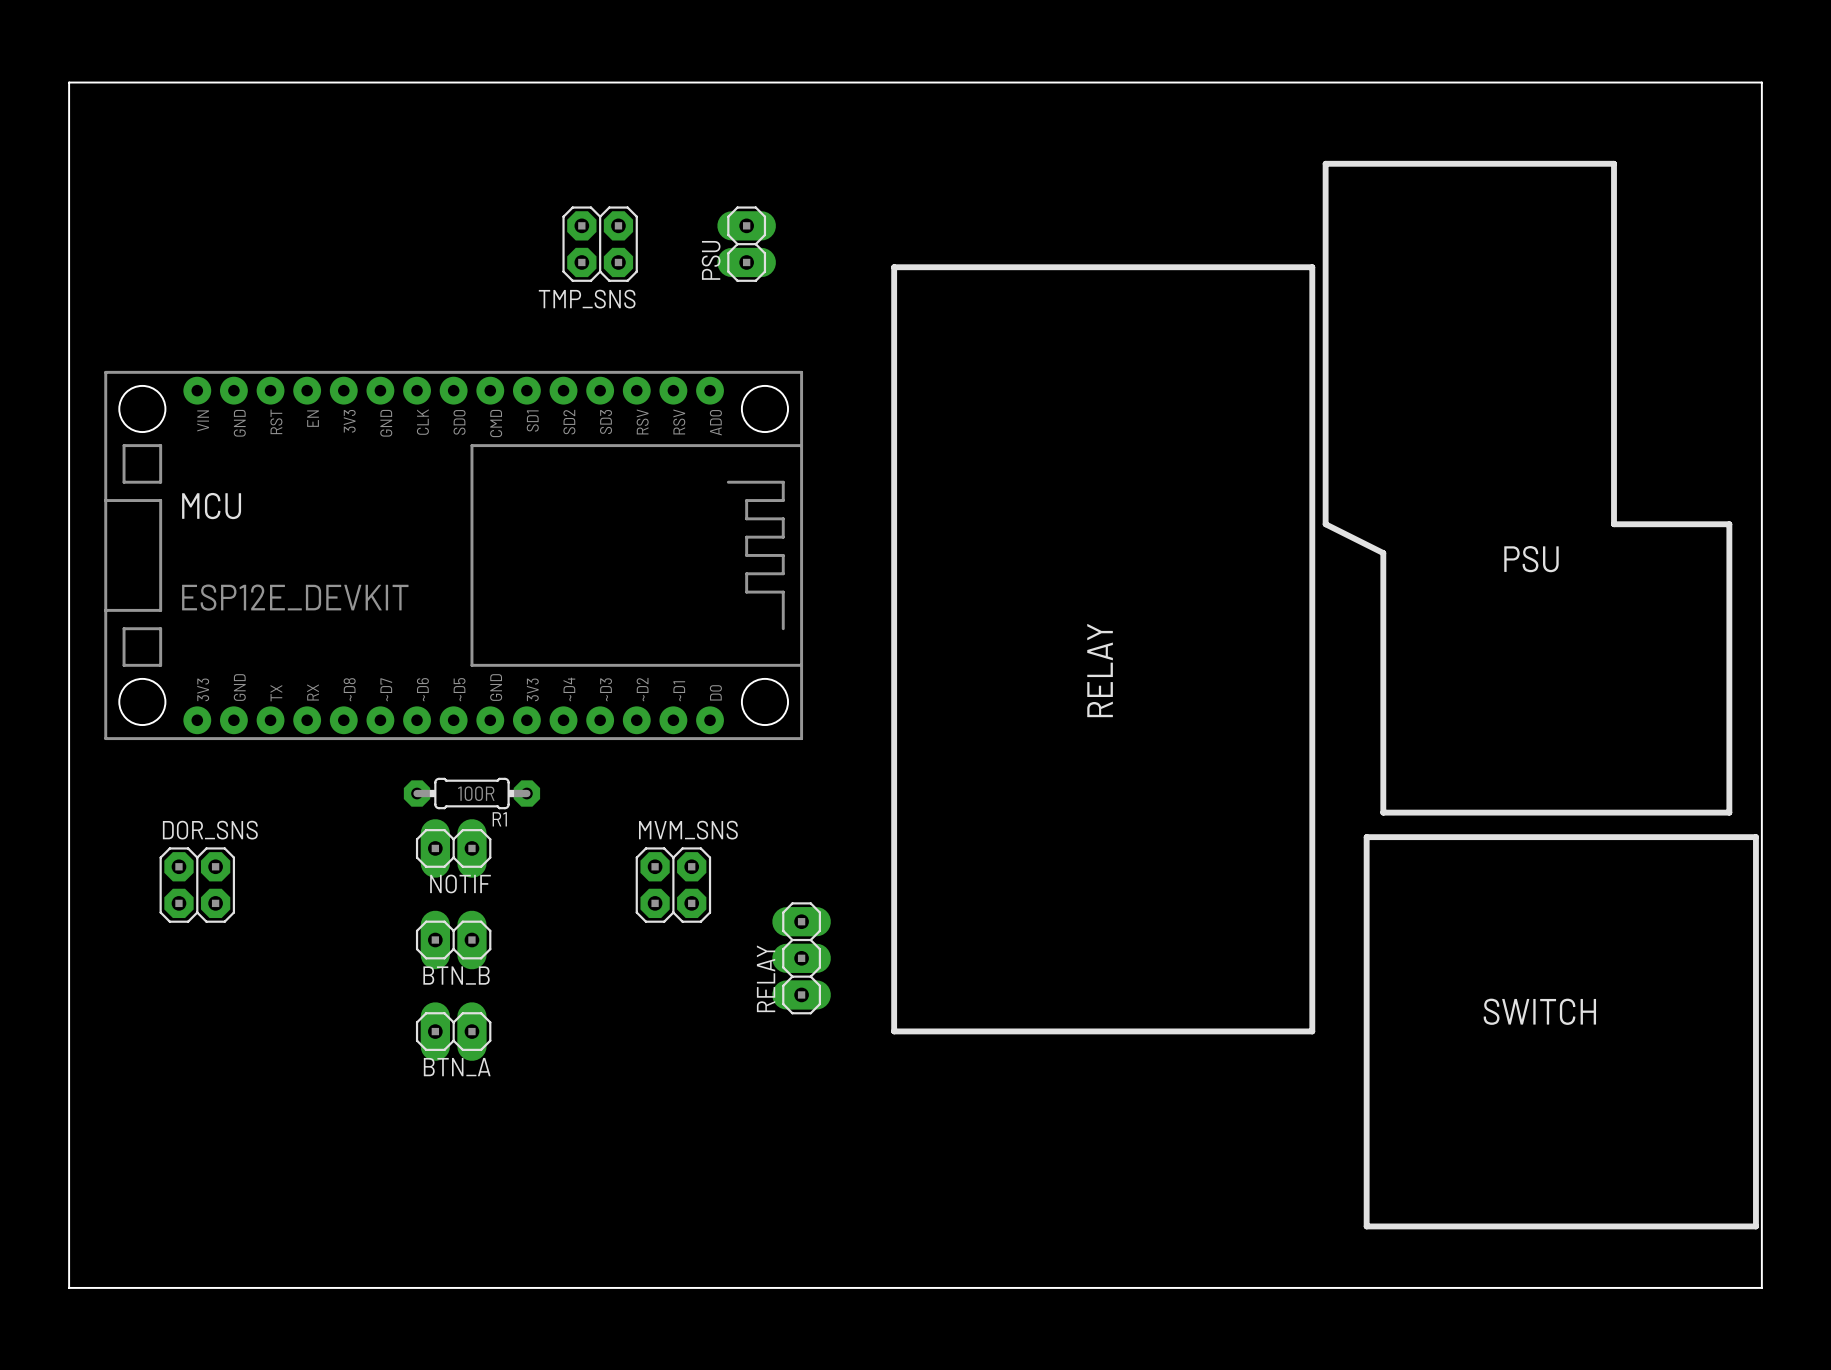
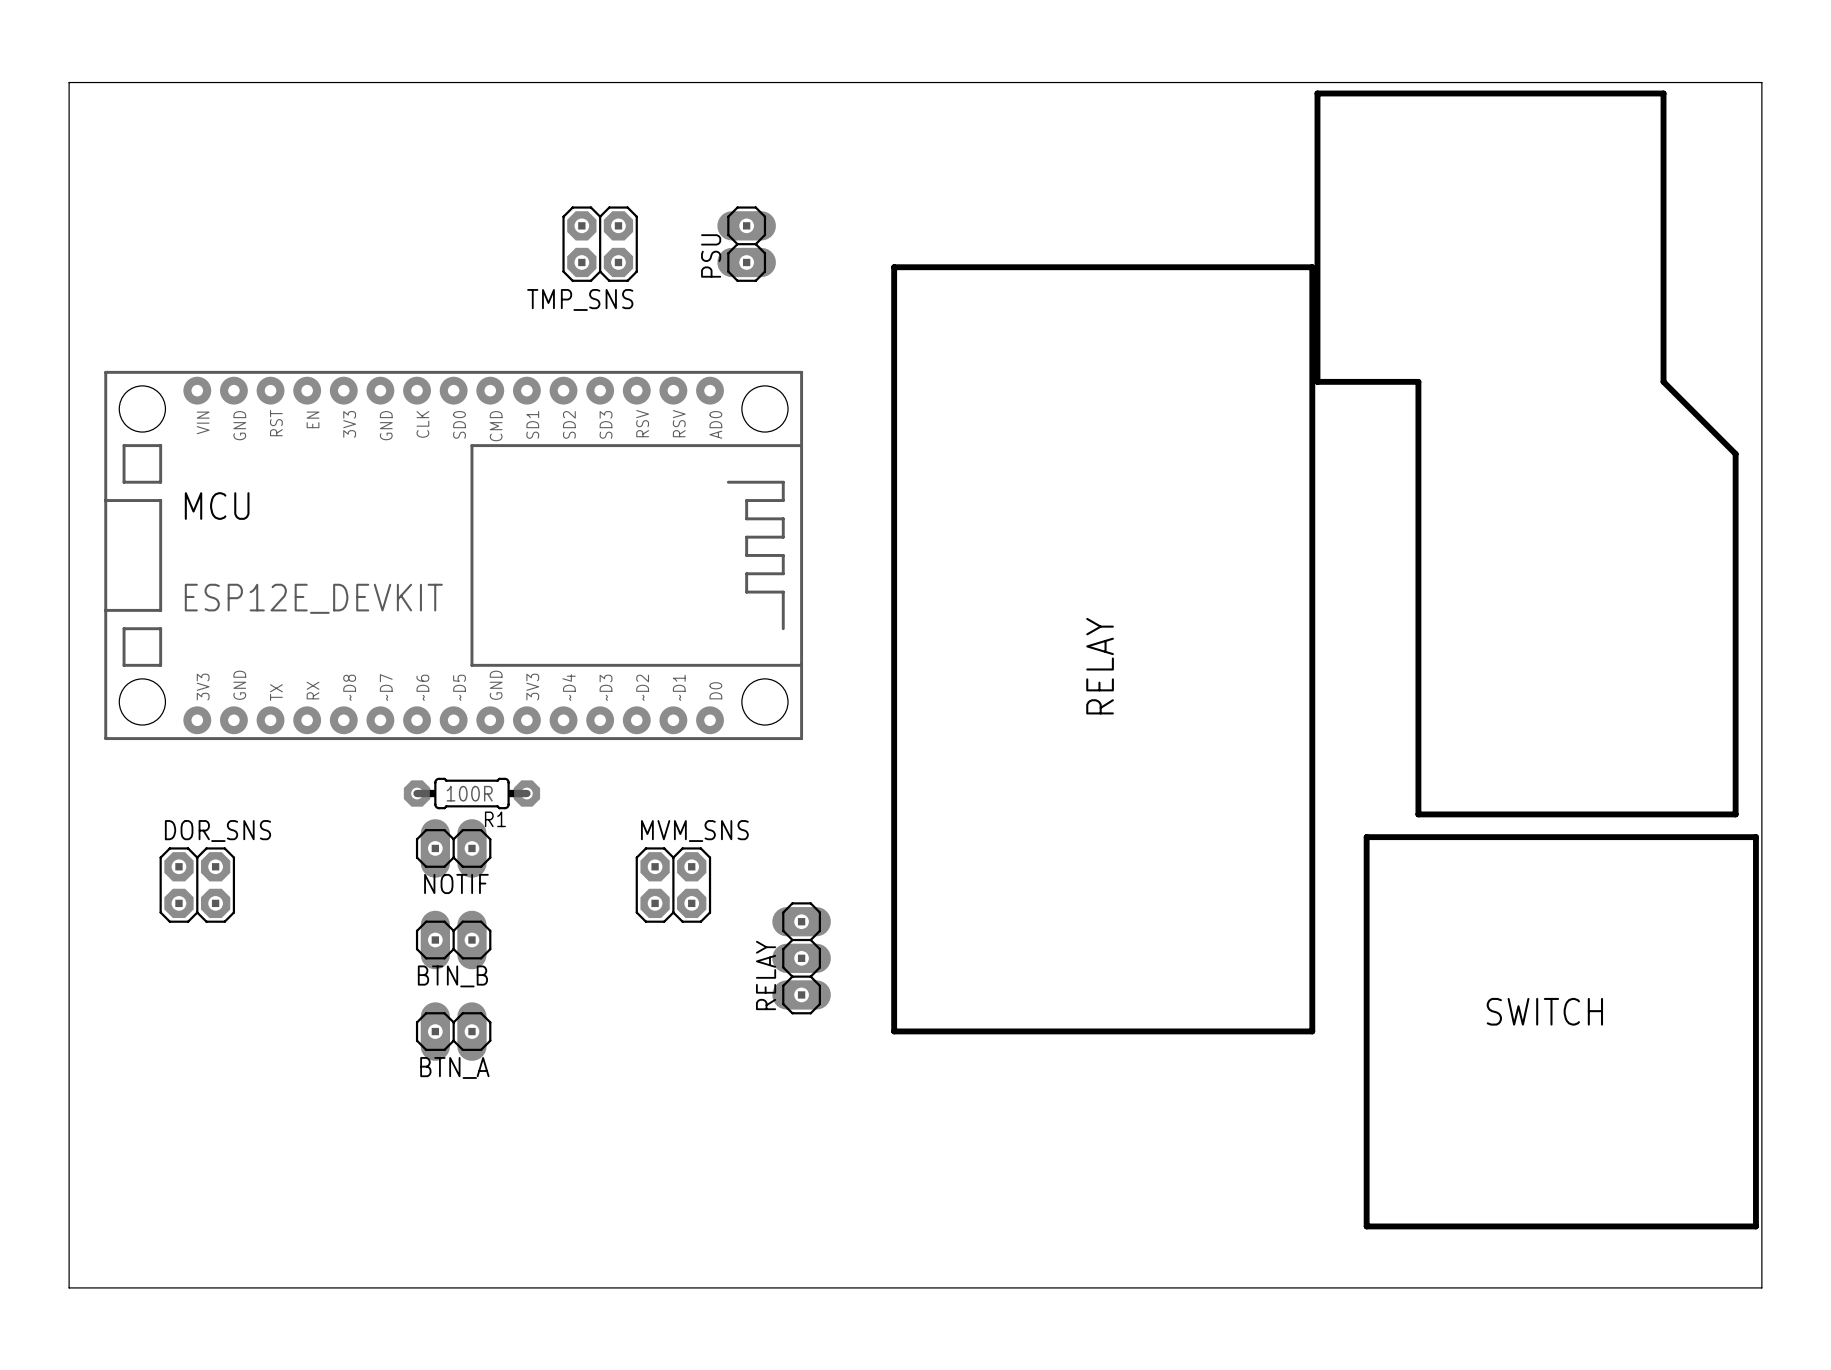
line: (1325, 163) (1325, 524) (1383, 553) (1383, 812) (1729, 812) (1729, 524) (1614, 524) (1614, 163) (1325, 163) -> (1317, 93) (1317, 381) (1418, 381) (1418, 814) (1735, 814) (1735, 453) (1663, 381) (1663, 93) (1317, 93)
text: PSU (1531, 559) -> none

